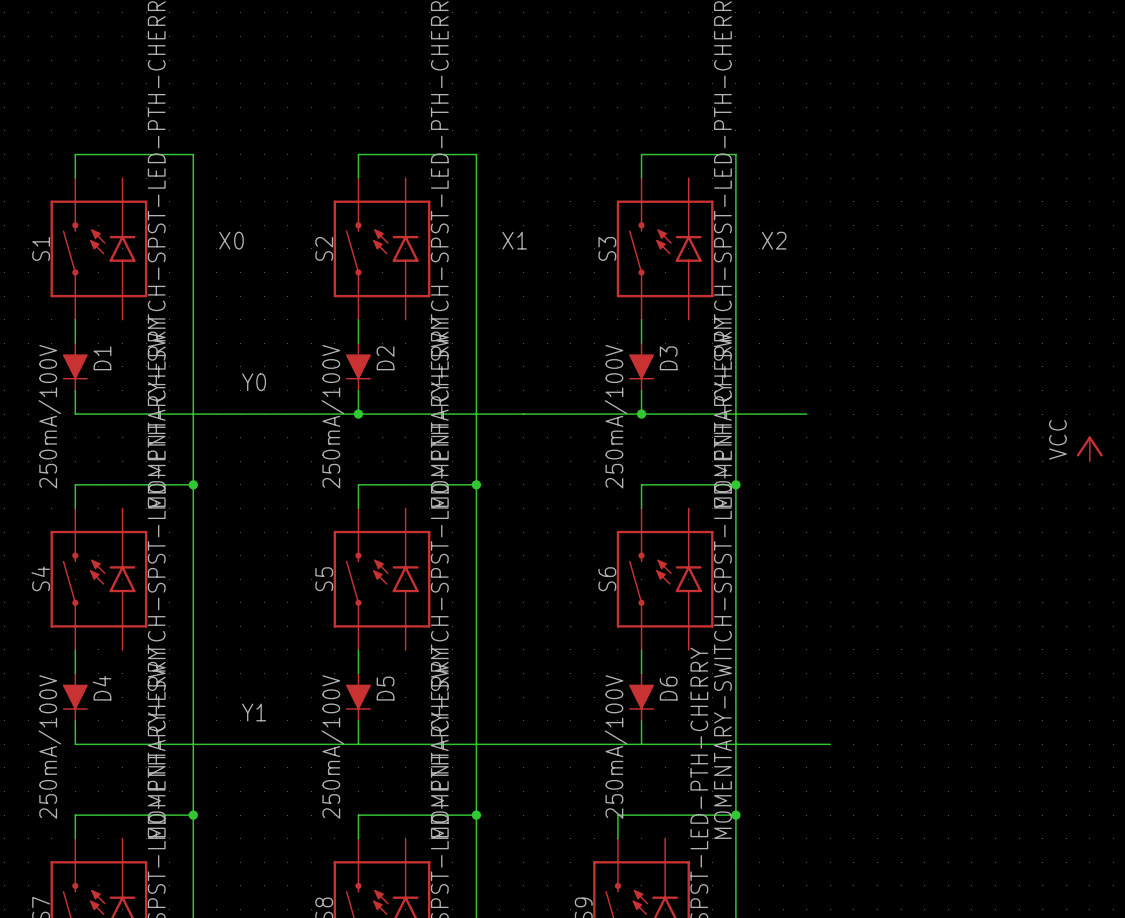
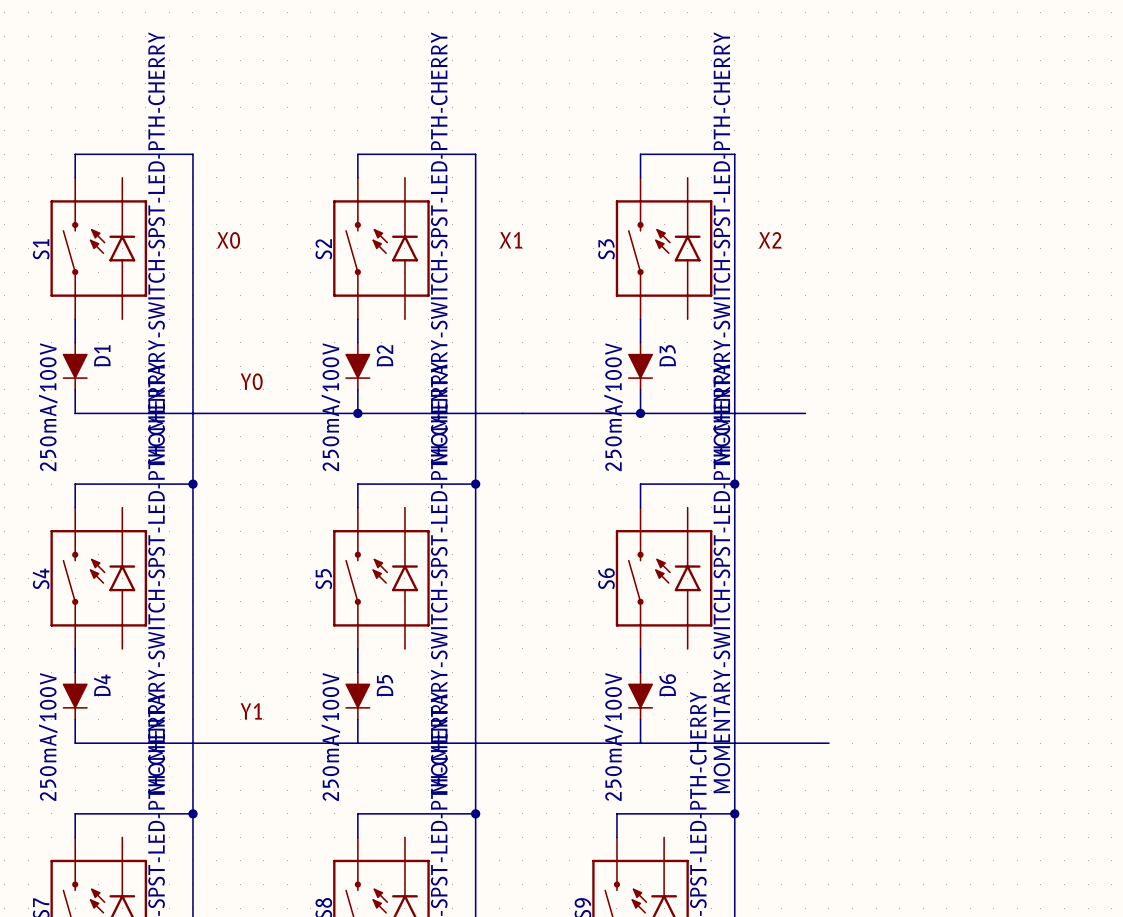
power symbol: VCC (1089, 448) -> none

